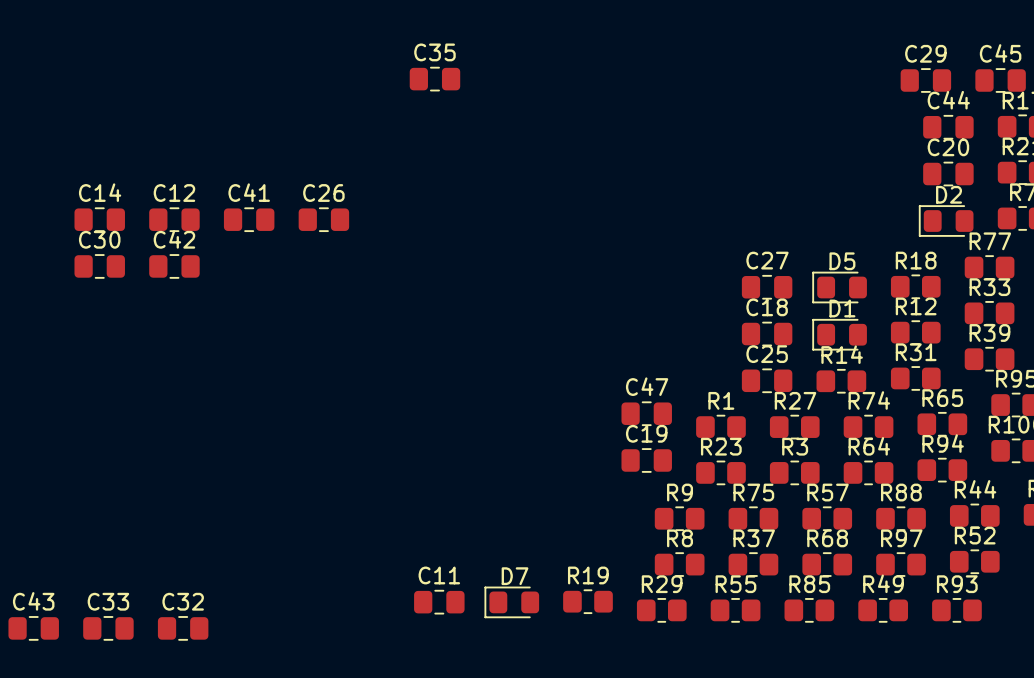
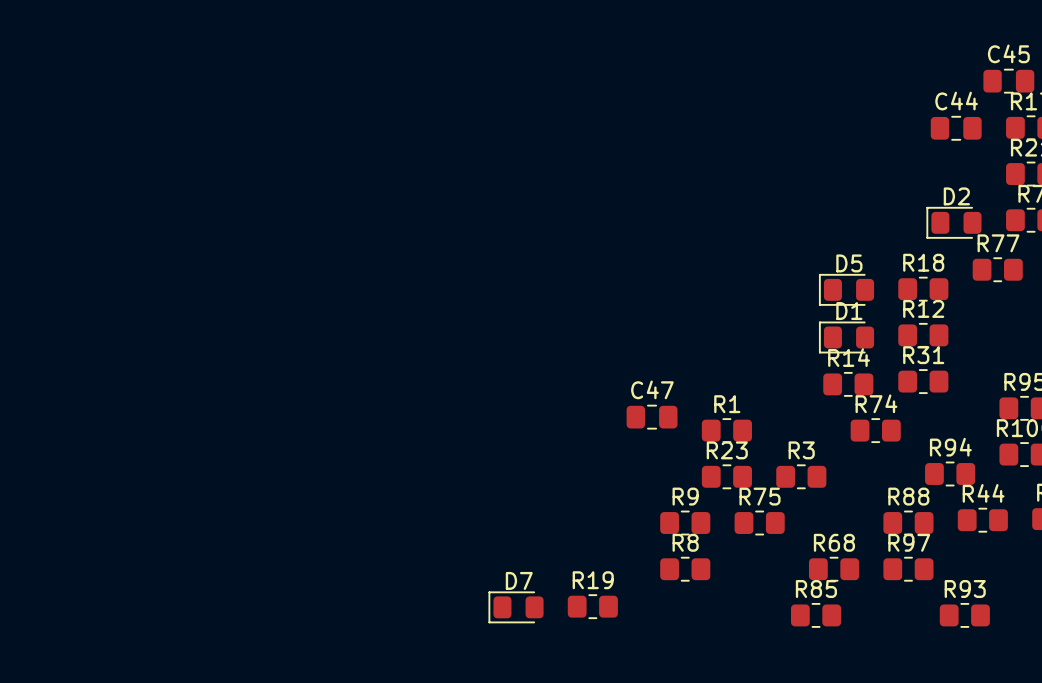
C35: (434, 79) -> none
C29: (925, 80) -> none
C20: (948, 174) -> none
C14: (99, 219) -> none
C12: (174, 219) -> none
C41: (249, 219) -> none
C26: (323, 219) -> none
C30: (99, 266) -> none
C42: (174, 266) -> none
C27: (767, 287) -> none
R33: (989, 313) -> none
C18: (767, 334) -> none
R39: (989, 359) -> none
C25: (767, 380) -> none
R65: (942, 424) -> none
R27: (794, 427) -> none
C19: (646, 460) -> none
R64: (868, 472) -> none
R57: (827, 518) -> none
R52: (974, 561) -> none
R37: (753, 564) -> none
C11: (439, 602) -> none
R29: (661, 610) -> none
R55: (735, 610) -> none
R49: (883, 610) -> none
C43: (33, 628) -> none
C33: (108, 628) -> none
C32: (183, 628) -> none

